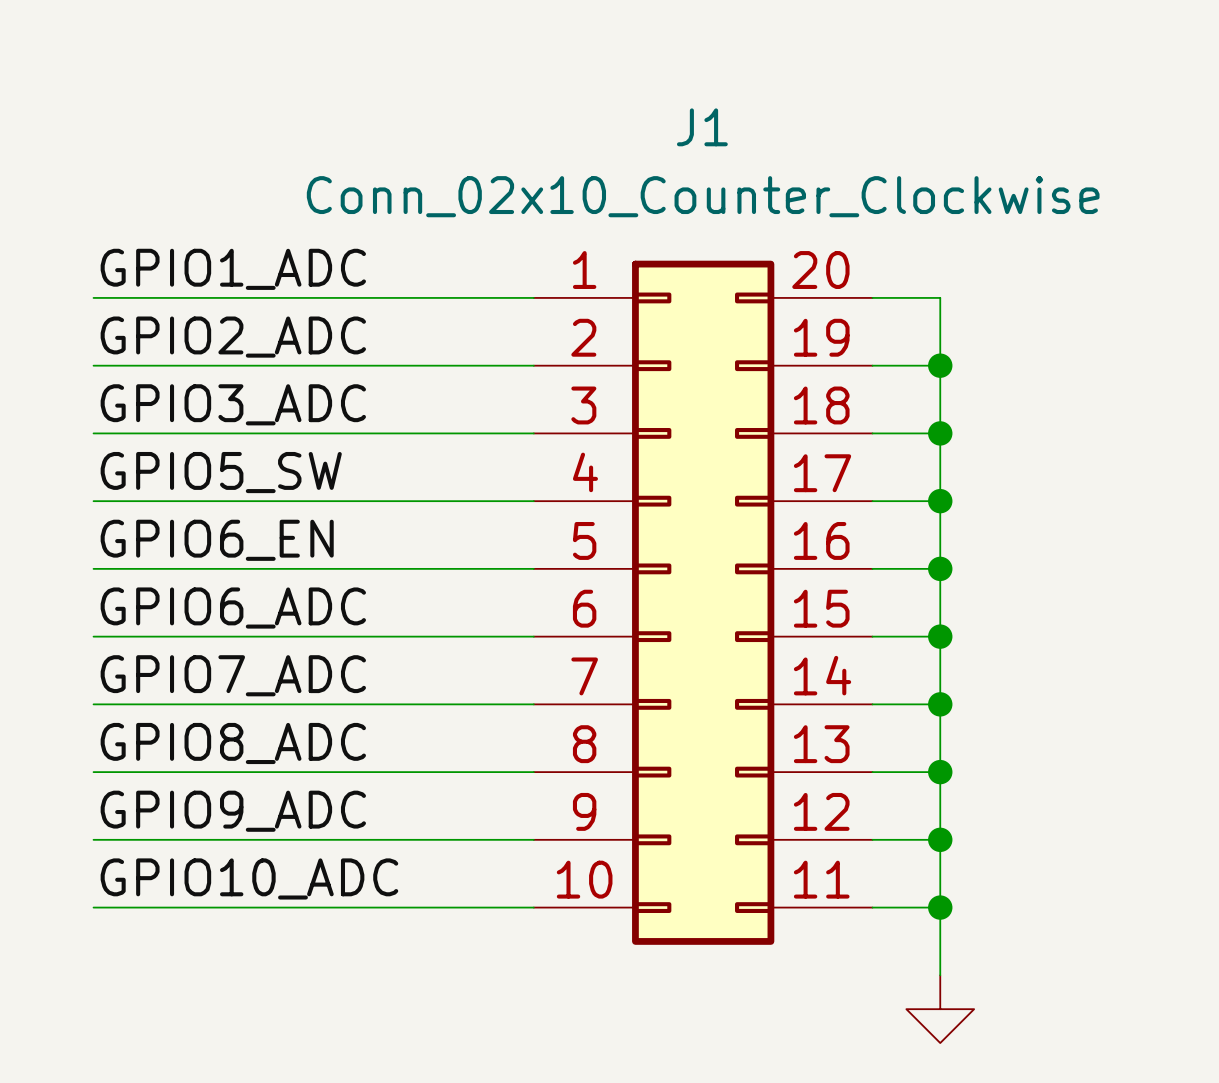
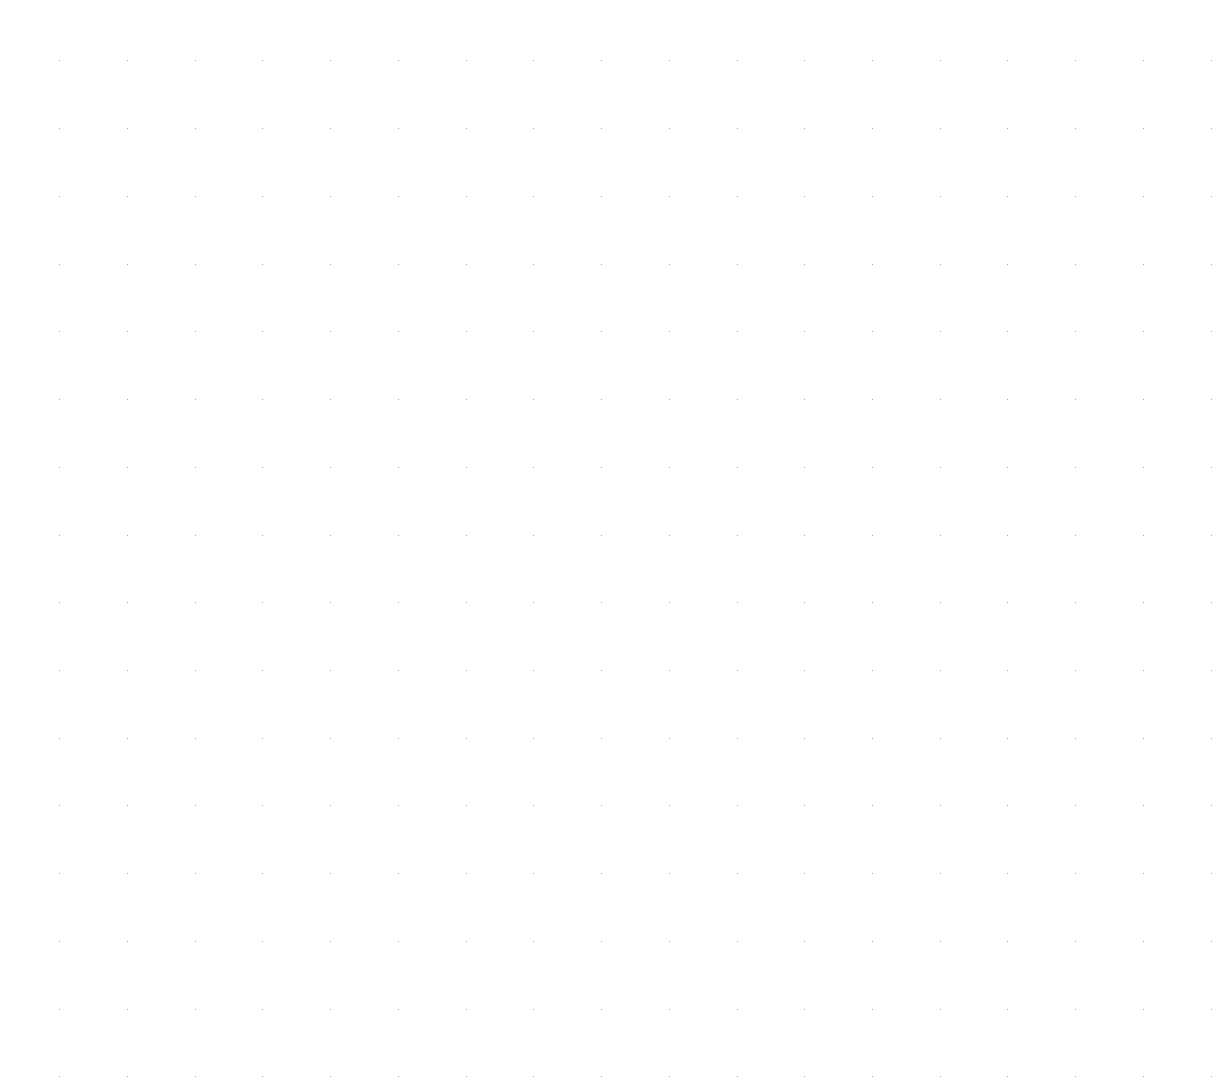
label: GPIO1_ADC (233, 269) -> none
wire: (93, 297) (533, 297) -> none
wire: (872, 297) (940, 297) (940, 975) -> none
label: GPIO2_ADC (233, 337) -> none
wire: (93, 365) (533, 365) -> none
wire: (872, 365) (940, 365) -> none
junction: (940, 365) -> none
label: GPIO3_ADC (233, 404) -> none
wire: (93, 433) (533, 433) -> none
wire: (872, 433) (940, 433) -> none
junction: (940, 433) -> none
label: GPIO5_SW (221, 472) -> none
wire: (93, 501) (533, 501) -> none
wire: (872, 501) (940, 501) -> none
junction: (940, 501) -> none
label: GPIO6_EN (217, 540) -> none
wire: (93, 568) (533, 568) -> none
wire: (872, 568) (940, 568) -> none
junction: (940, 568) -> none
J1: Conn_02x10_Counter_Clockwise (703, 602) -> none
label: GPIO6_ADC (233, 608) -> none
wire: (93, 636) (533, 636) -> none
wire: (872, 636) (940, 636) -> none
junction: (940, 636) -> none
label: GPIO7_ADC (233, 675) -> none
wire: (93, 704) (533, 704) -> none
wire: (872, 704) (940, 704) -> none
junction: (940, 704) -> none
label: GPIO8_ADC (233, 743) -> none
wire: (93, 772) (533, 772) -> none
wire: (872, 772) (940, 772) -> none
junction: (940, 772) -> none
label: GPIO9_ADC (233, 811) -> none
wire: (93, 839) (533, 839) -> none
wire: (872, 839) (940, 839) -> none
junction: (940, 839) -> none
label: GPIO10_ADC (249, 878) -> none
wire: (93, 907) (533, 907) -> none
wire: (872, 907) (940, 907) -> none
junction: (940, 907) -> none
power symbol: (940, 1009) -> none

